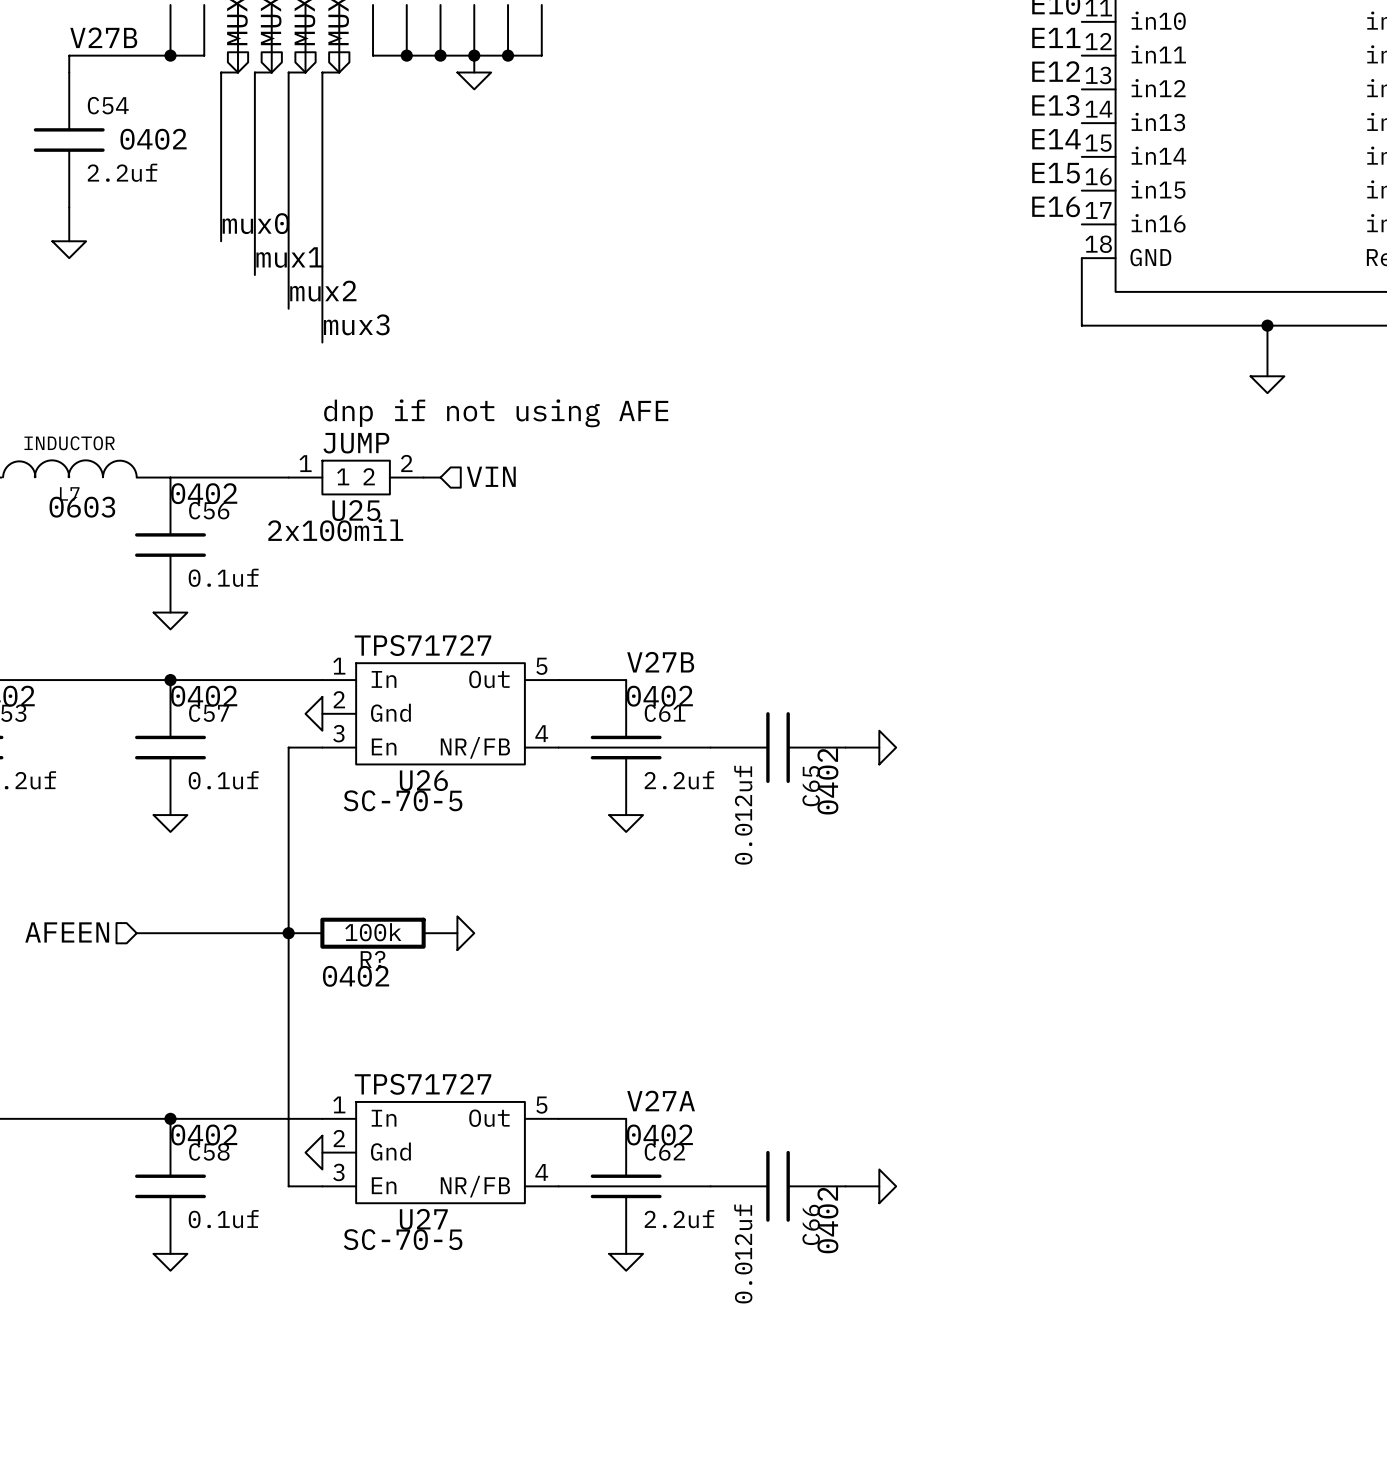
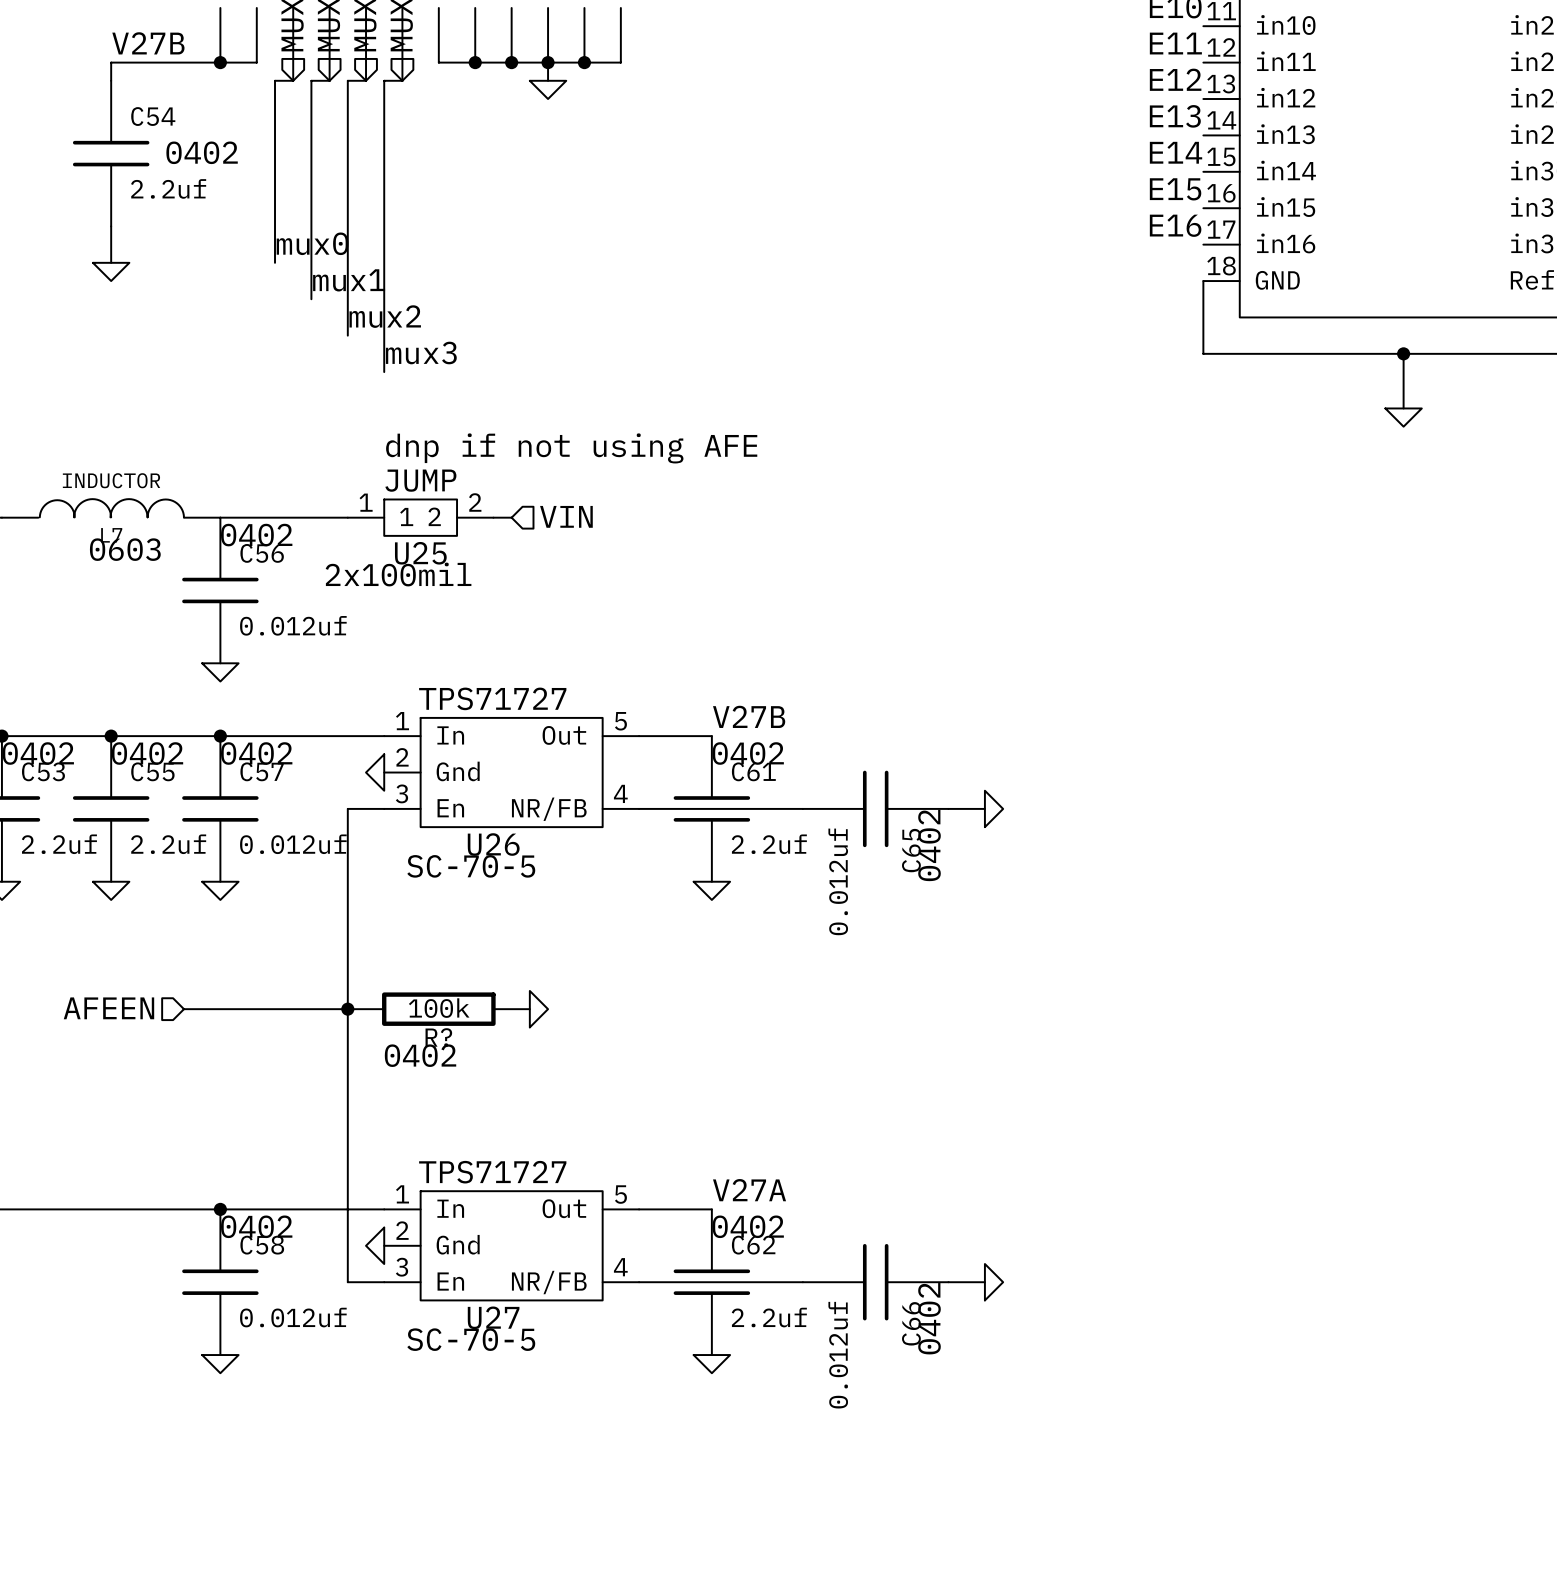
C56 value: 0.1uf (223, 577) -> 0.012uf (293, 625)
junction: none -> (111, 736)
C55: none -> 2.2uf (111, 808)
C57 value: 0.1uf (223, 780) -> 0.012uf (293, 844)
power symbol: none -> (111, 890)
C58 value: 0.1uf (223, 1219) -> 0.012uf (293, 1317)

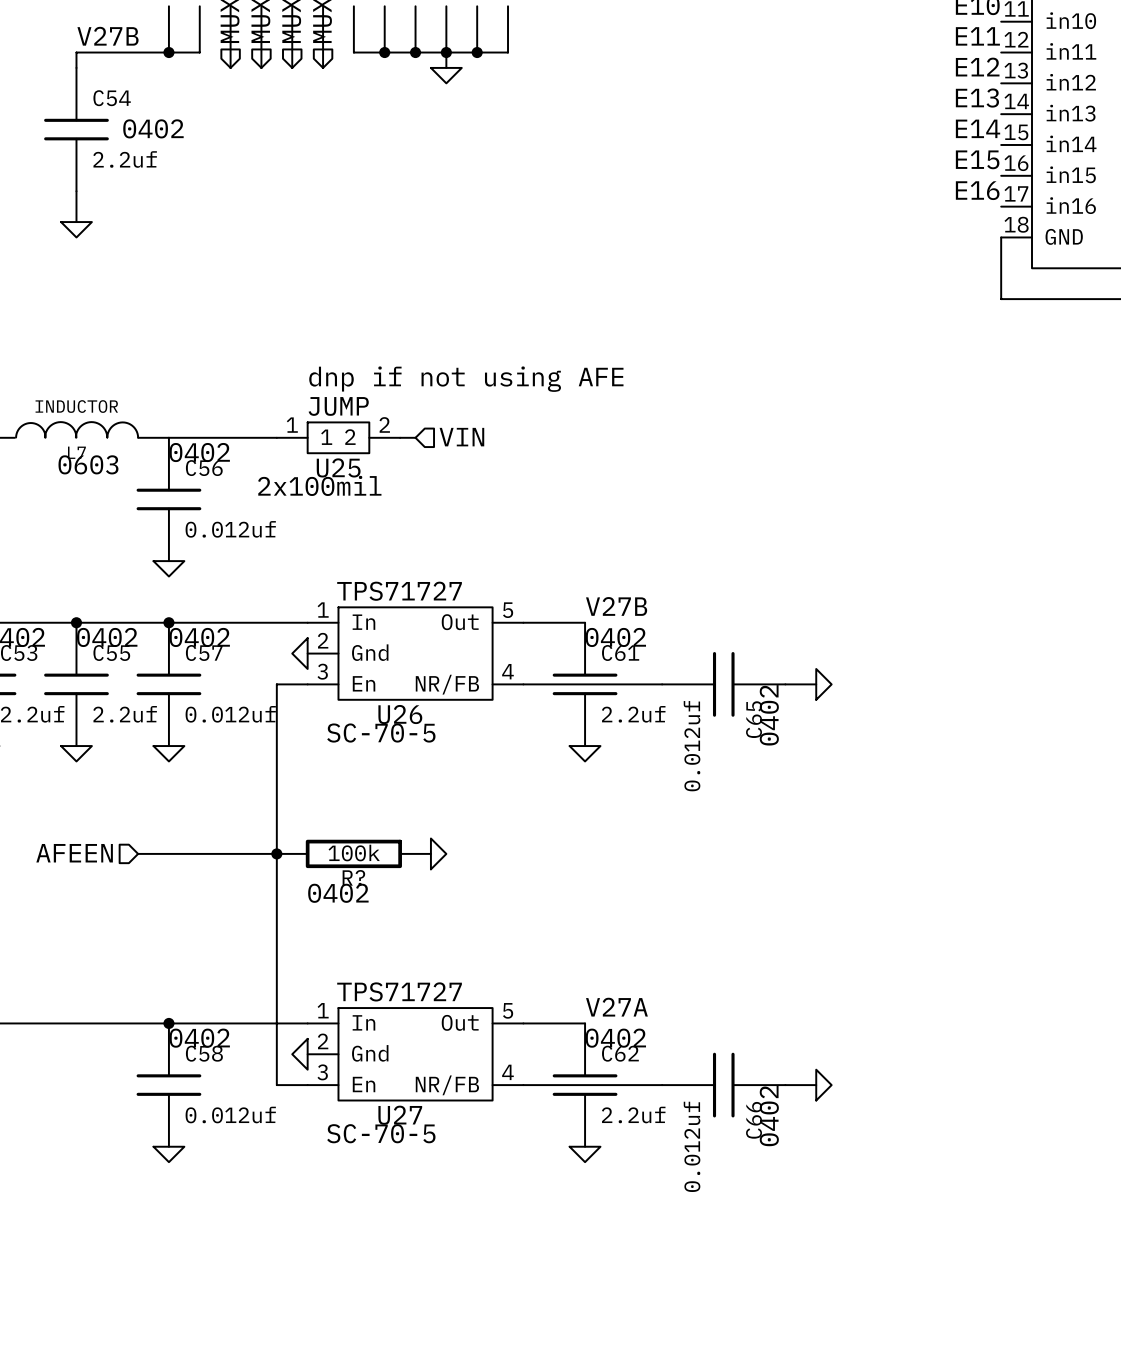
wire: (293, 80) (275, 80) (275, 262) -> none
wire: (329, 80) (311, 80) (311, 299) -> none
wire: (366, 80) (347, 80) (347, 335) -> none
wire: (402, 80) (384, 80) (384, 372) -> none
label: mux0 (312, 243) -> none
label: mux1 (349, 280) -> none
label: mux2 (385, 316) -> none
label: mux3 (421, 352) -> none

